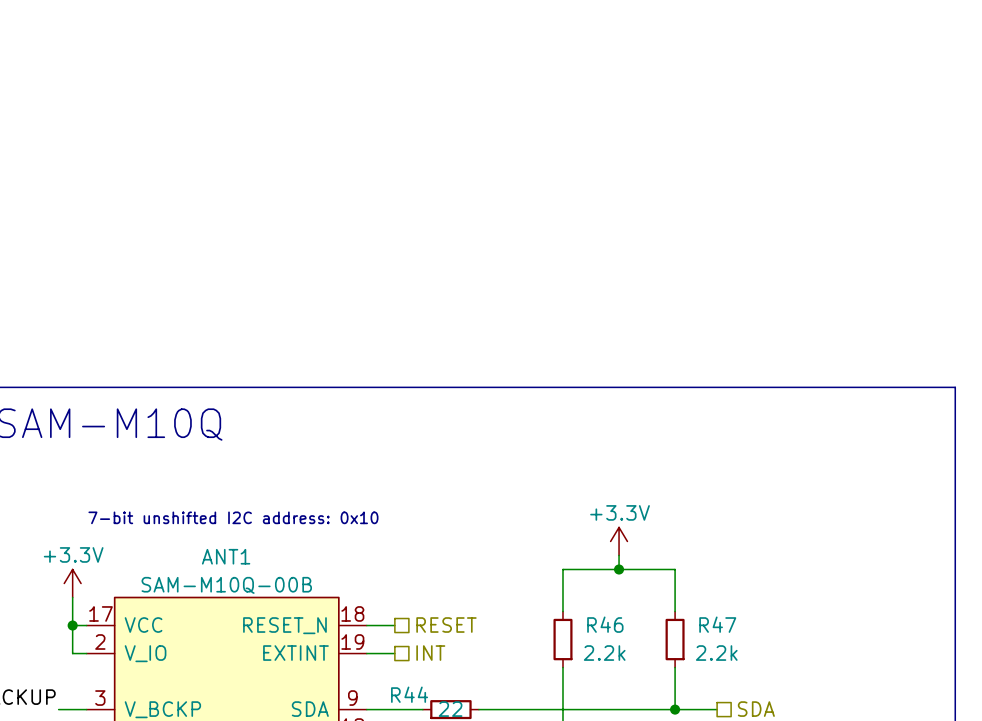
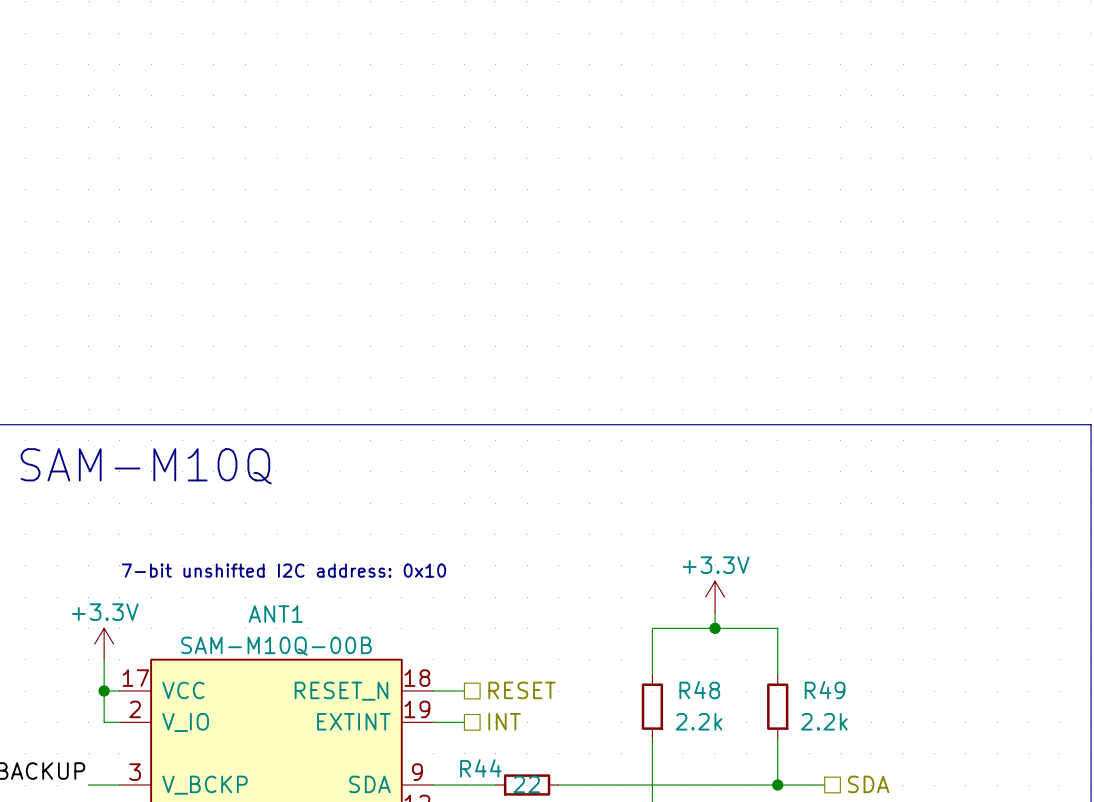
R46 name: R46 (605, 624) -> R48 (699, 690)
R47 name: R47 (717, 624) -> R49 (825, 690)

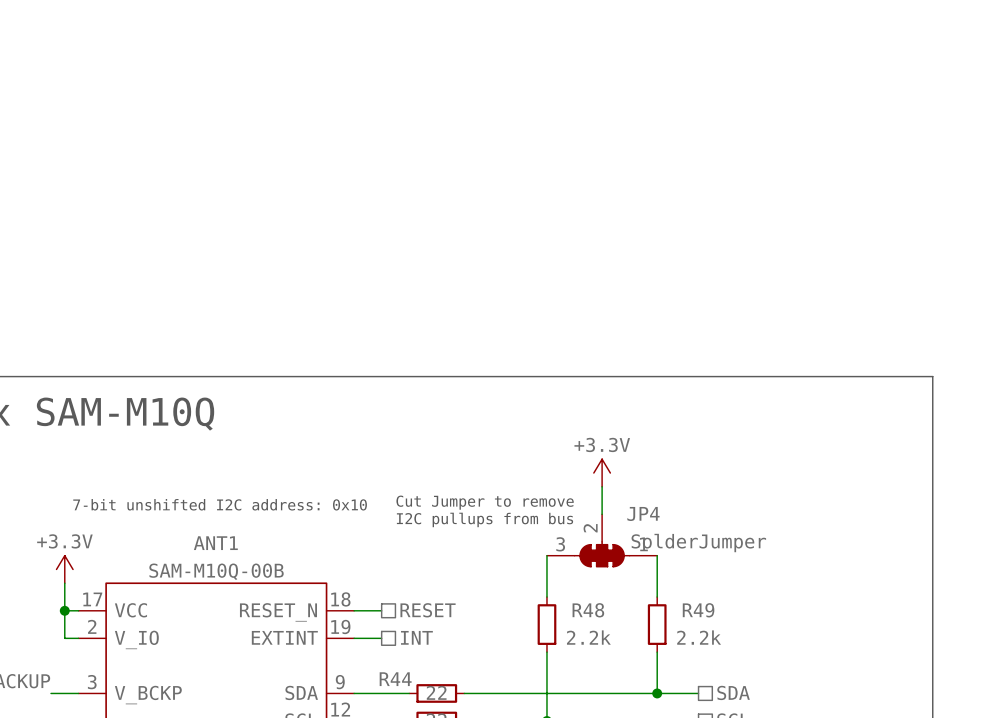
wire: none -> (602, 486) (602, 514)
text: none -> Cut Jumper to remove (485, 502)
text: none -> I2C pullups from bus (485, 519)
power symbol position: +3.3V (715, 597) -> +3.3V (602, 473)
JP4: none -> SolderJumper (602, 540)
junction: (715, 628) -> none

